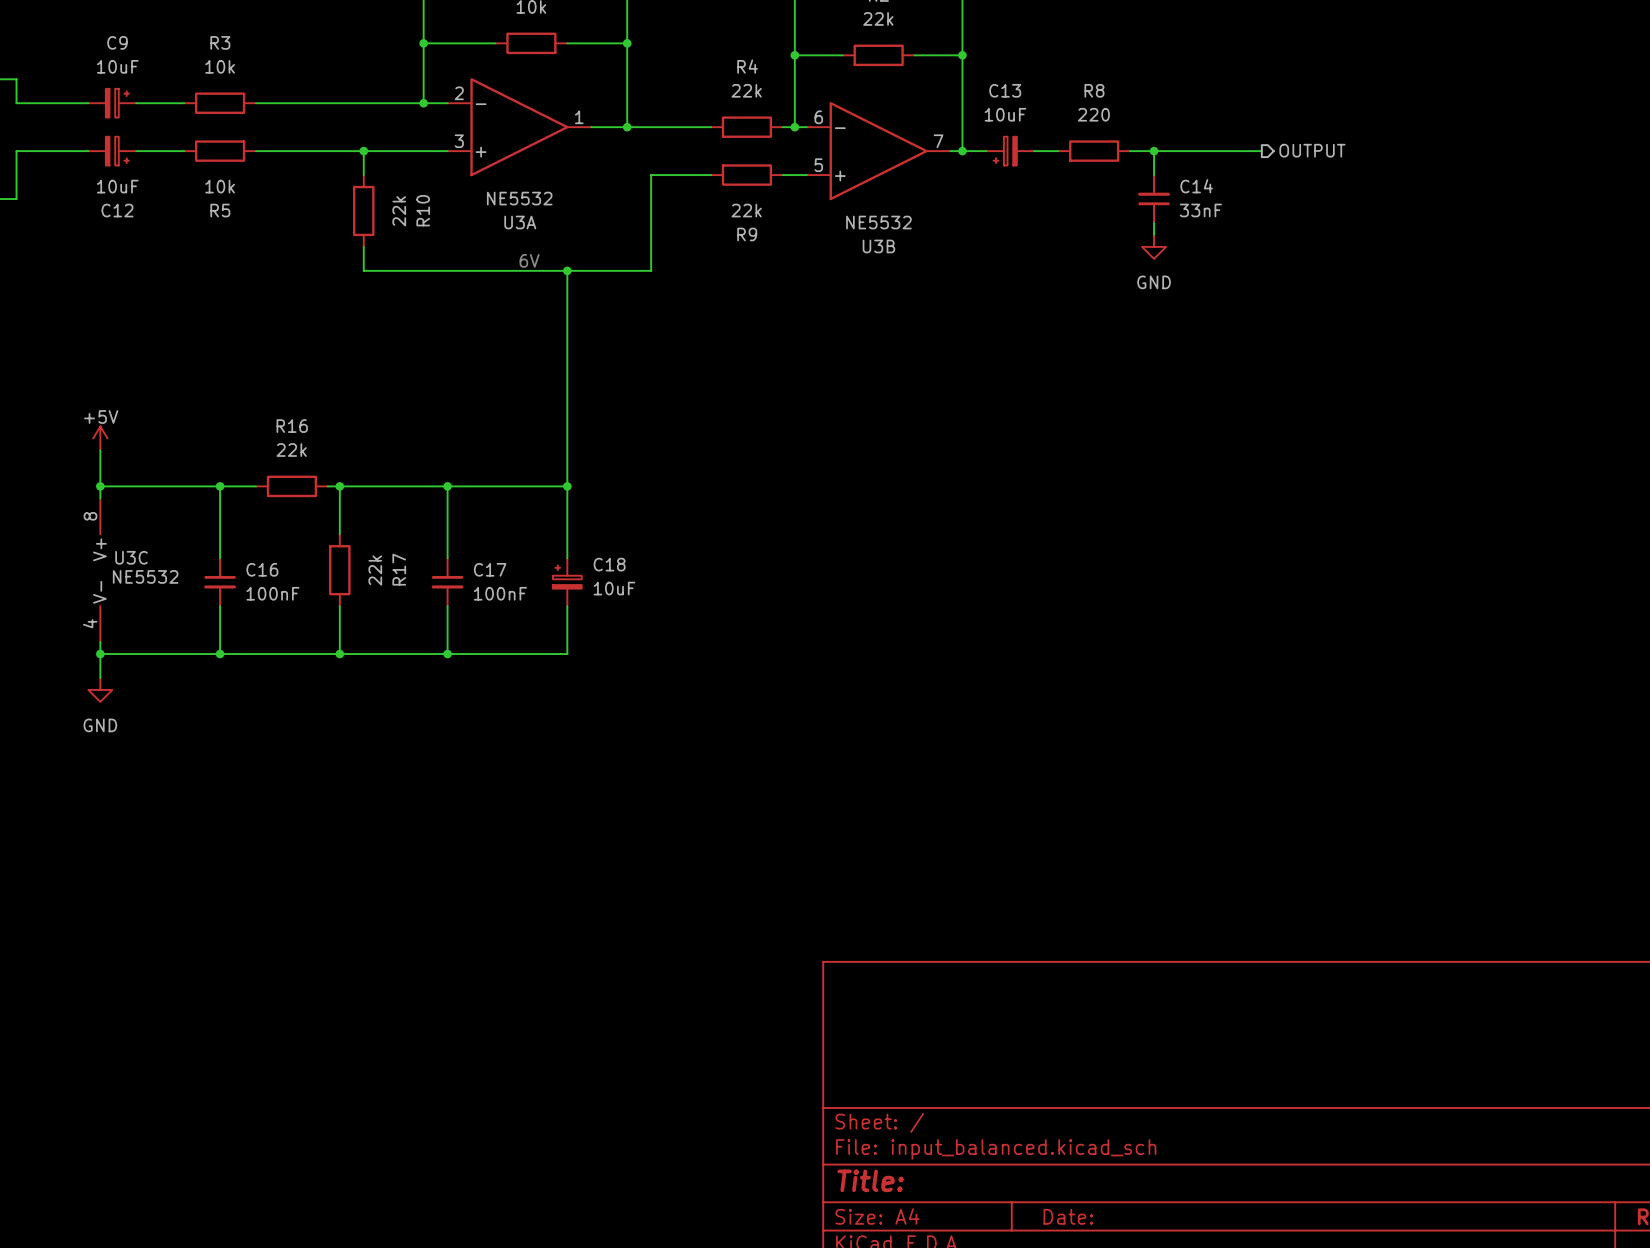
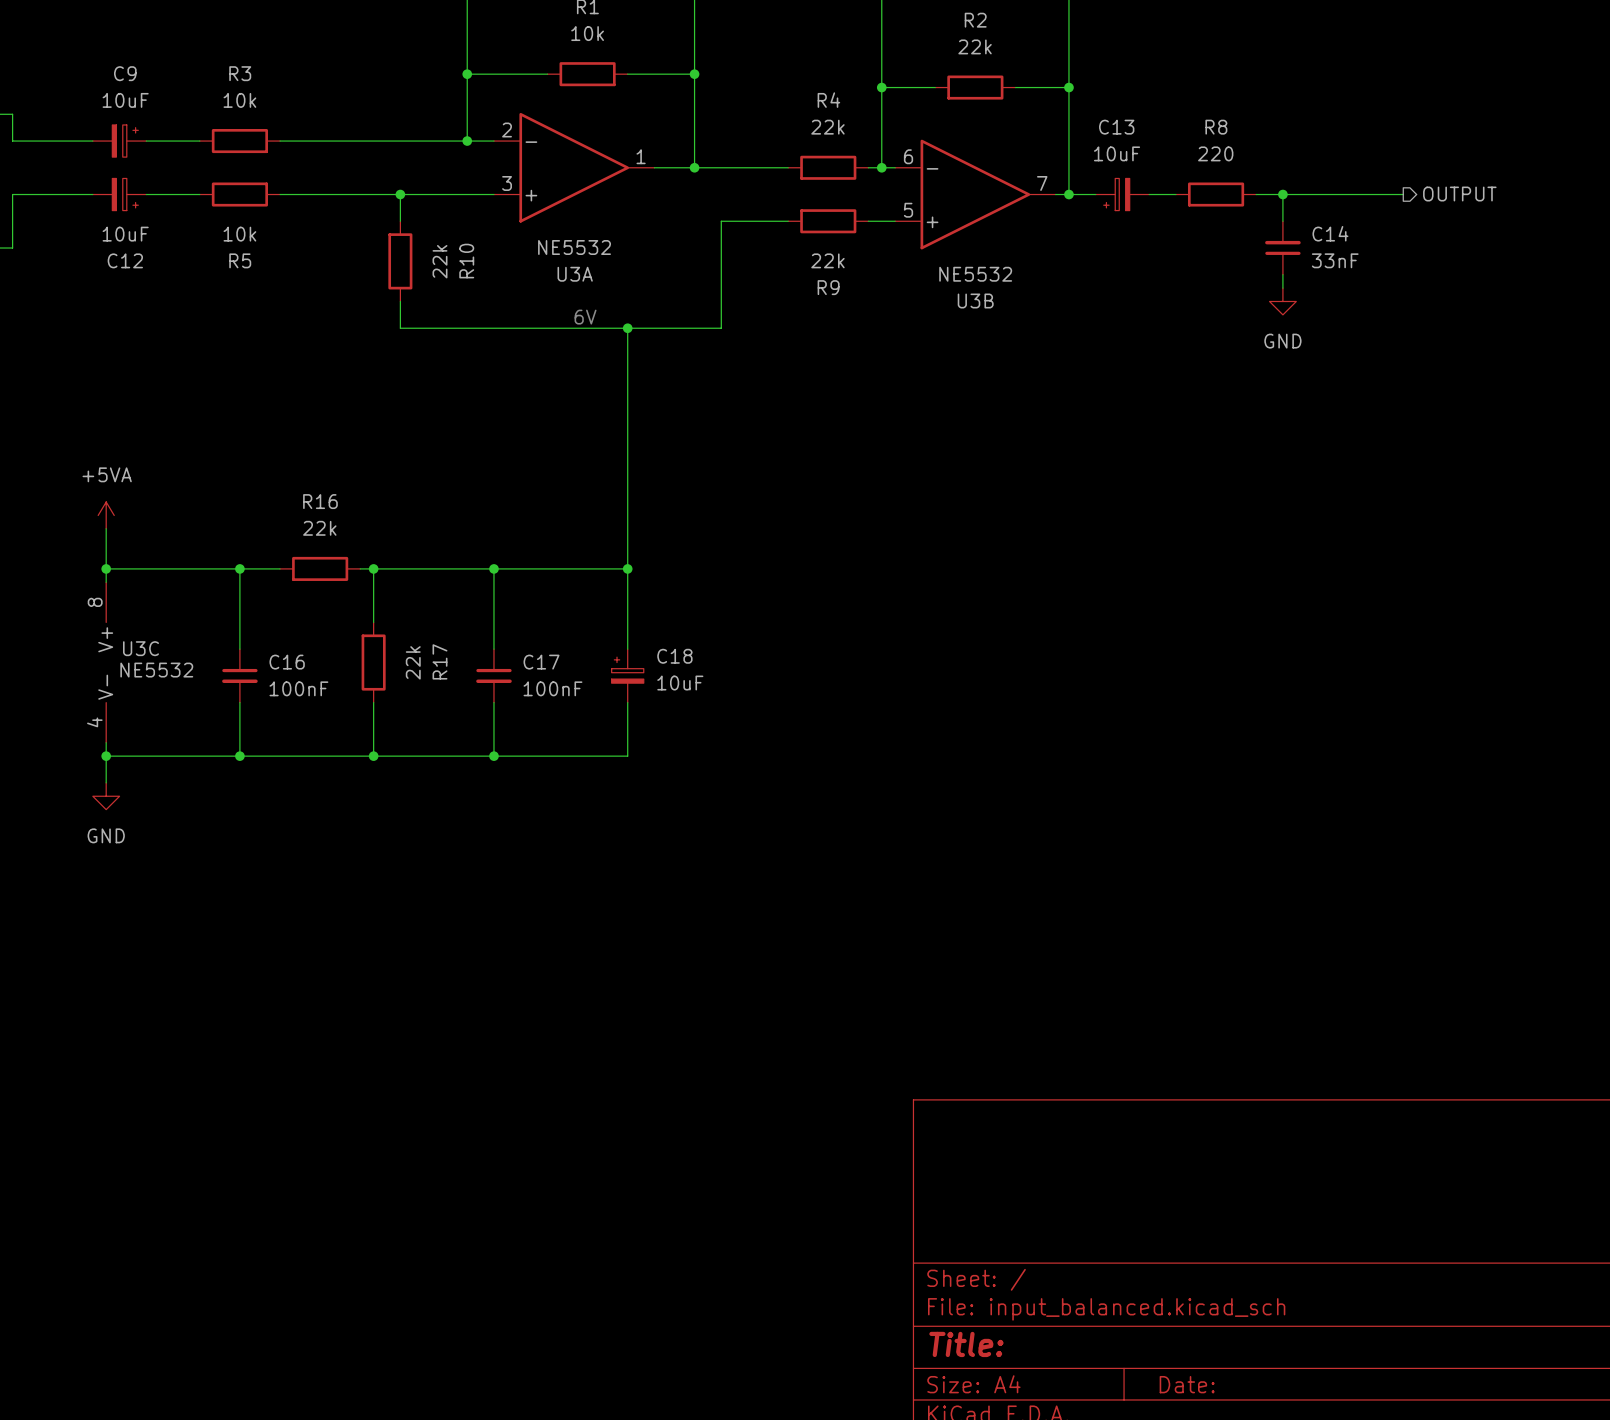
power symbol: +5V (100, 438) -> +5VA (106, 515)

